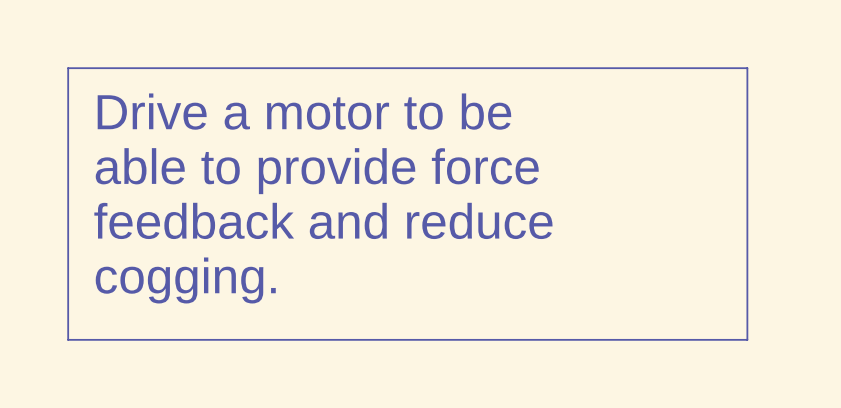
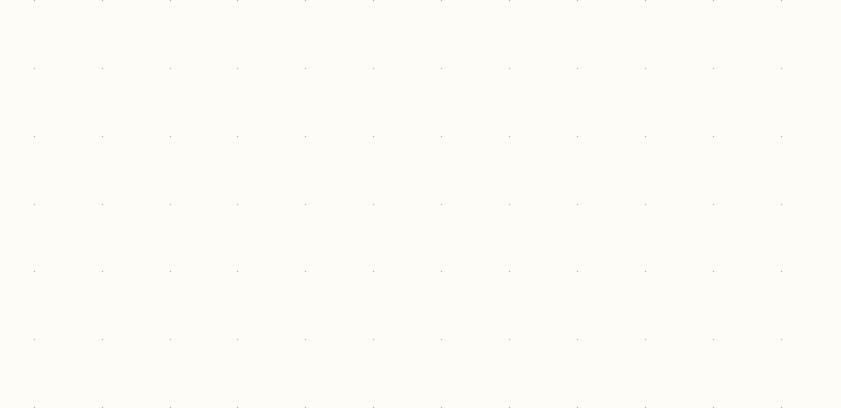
line: (68, 68) (747, 68) (747, 339) (68, 339) (68, 68) -> none
text: Drive a motor to be (304, 111) -> none
text: able to provide force (317, 171) -> none
text: feedback and reduce (323, 220) -> none
text: cogging. (185, 280) -> none

